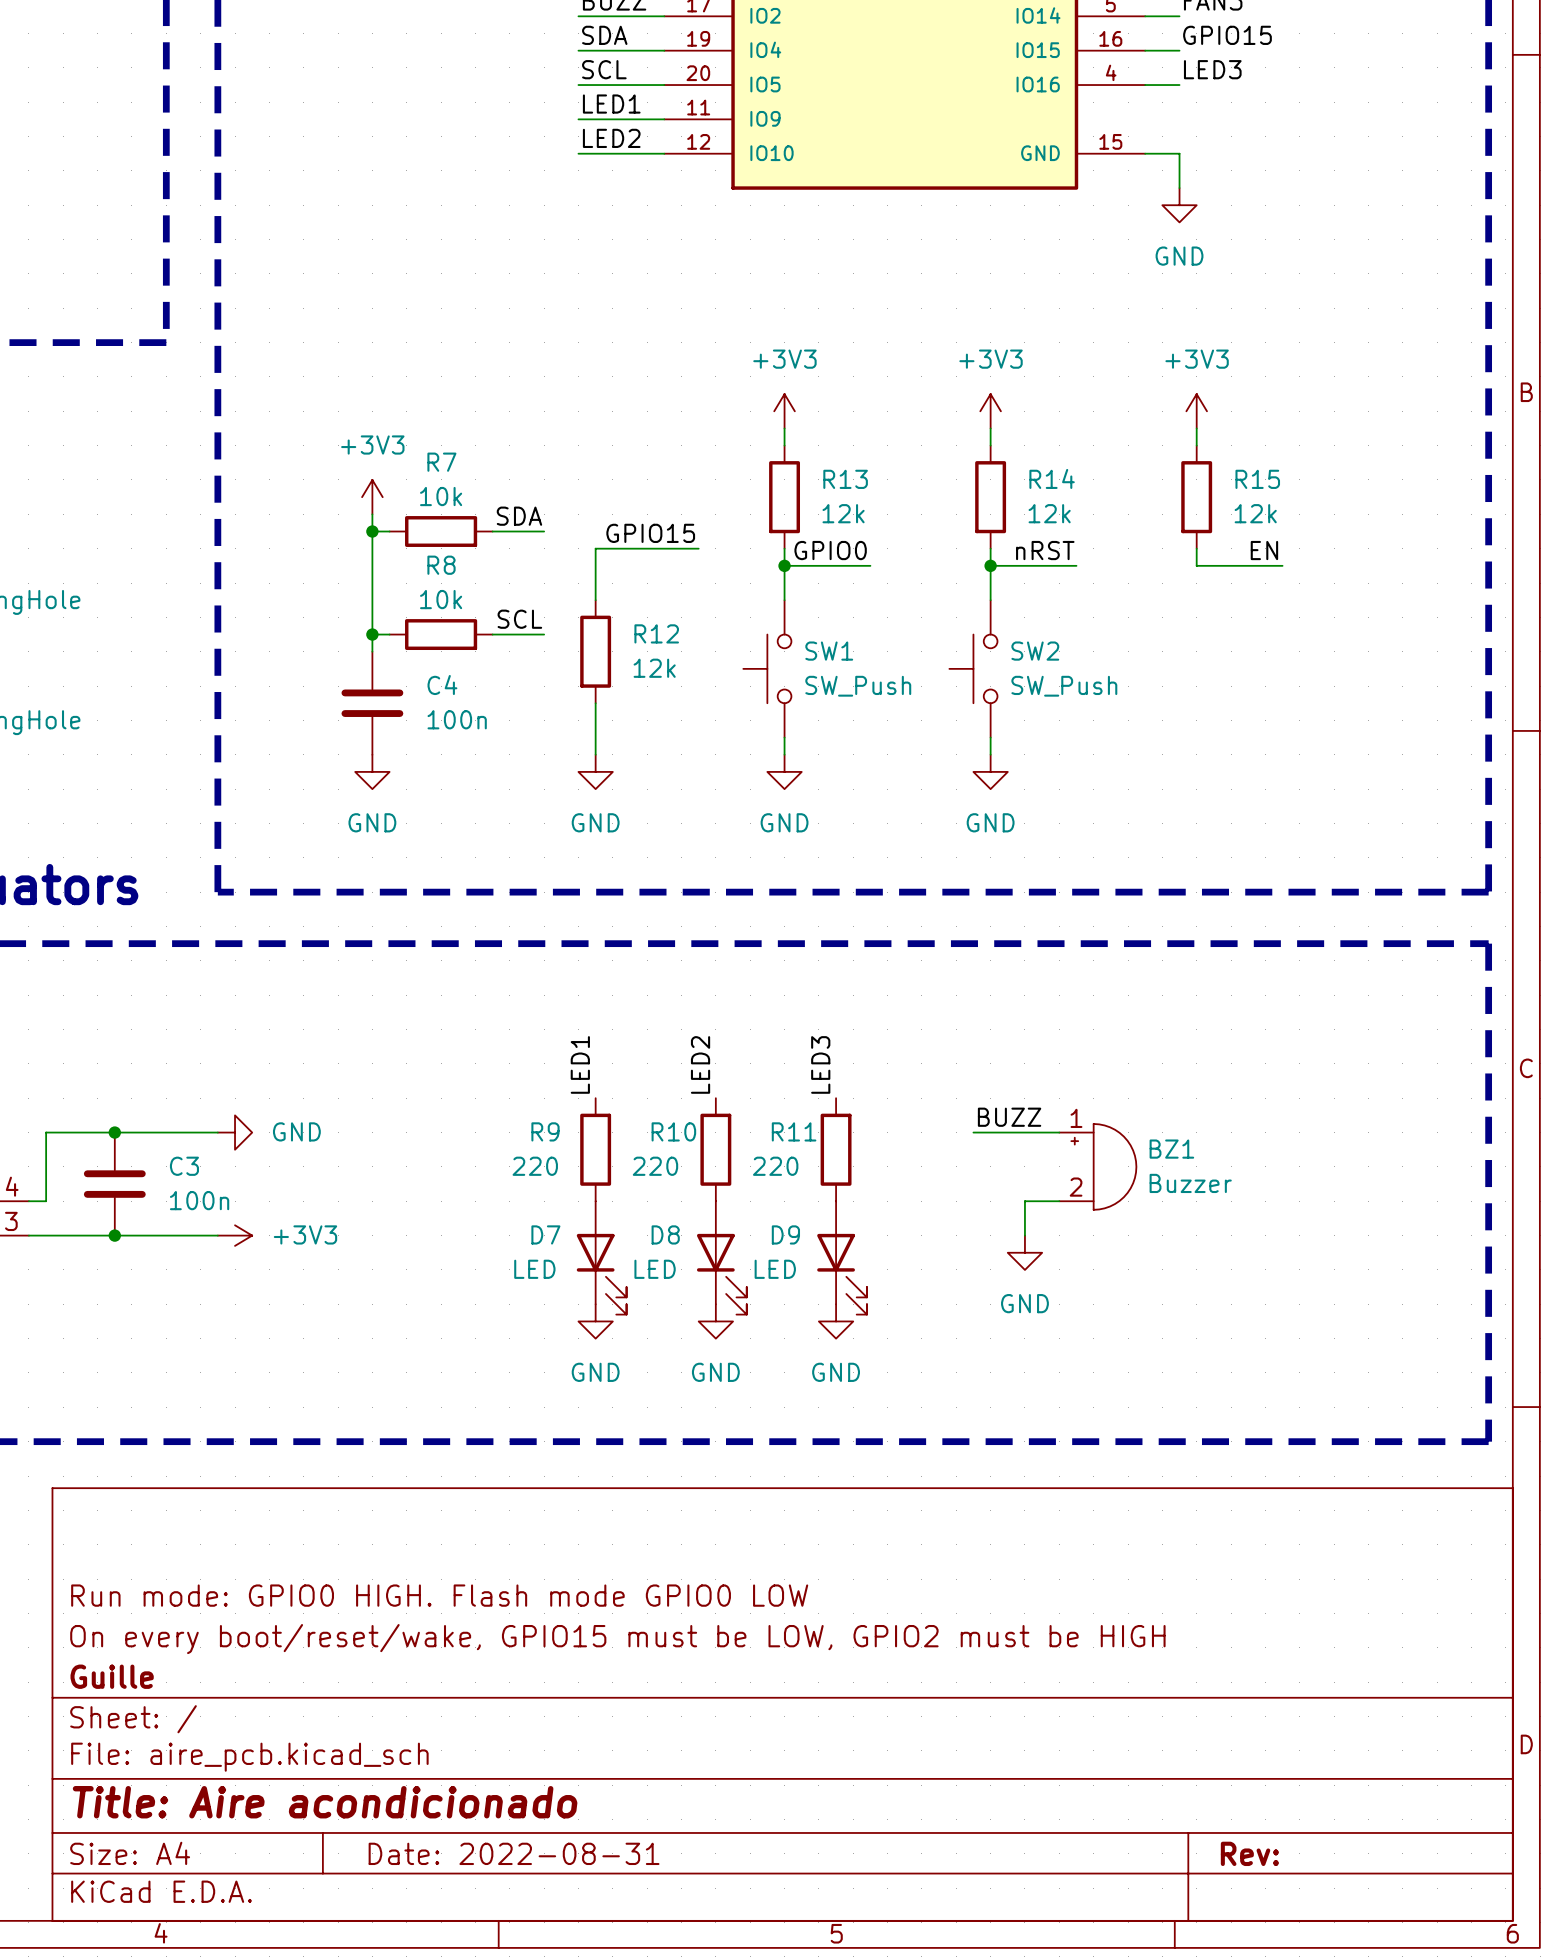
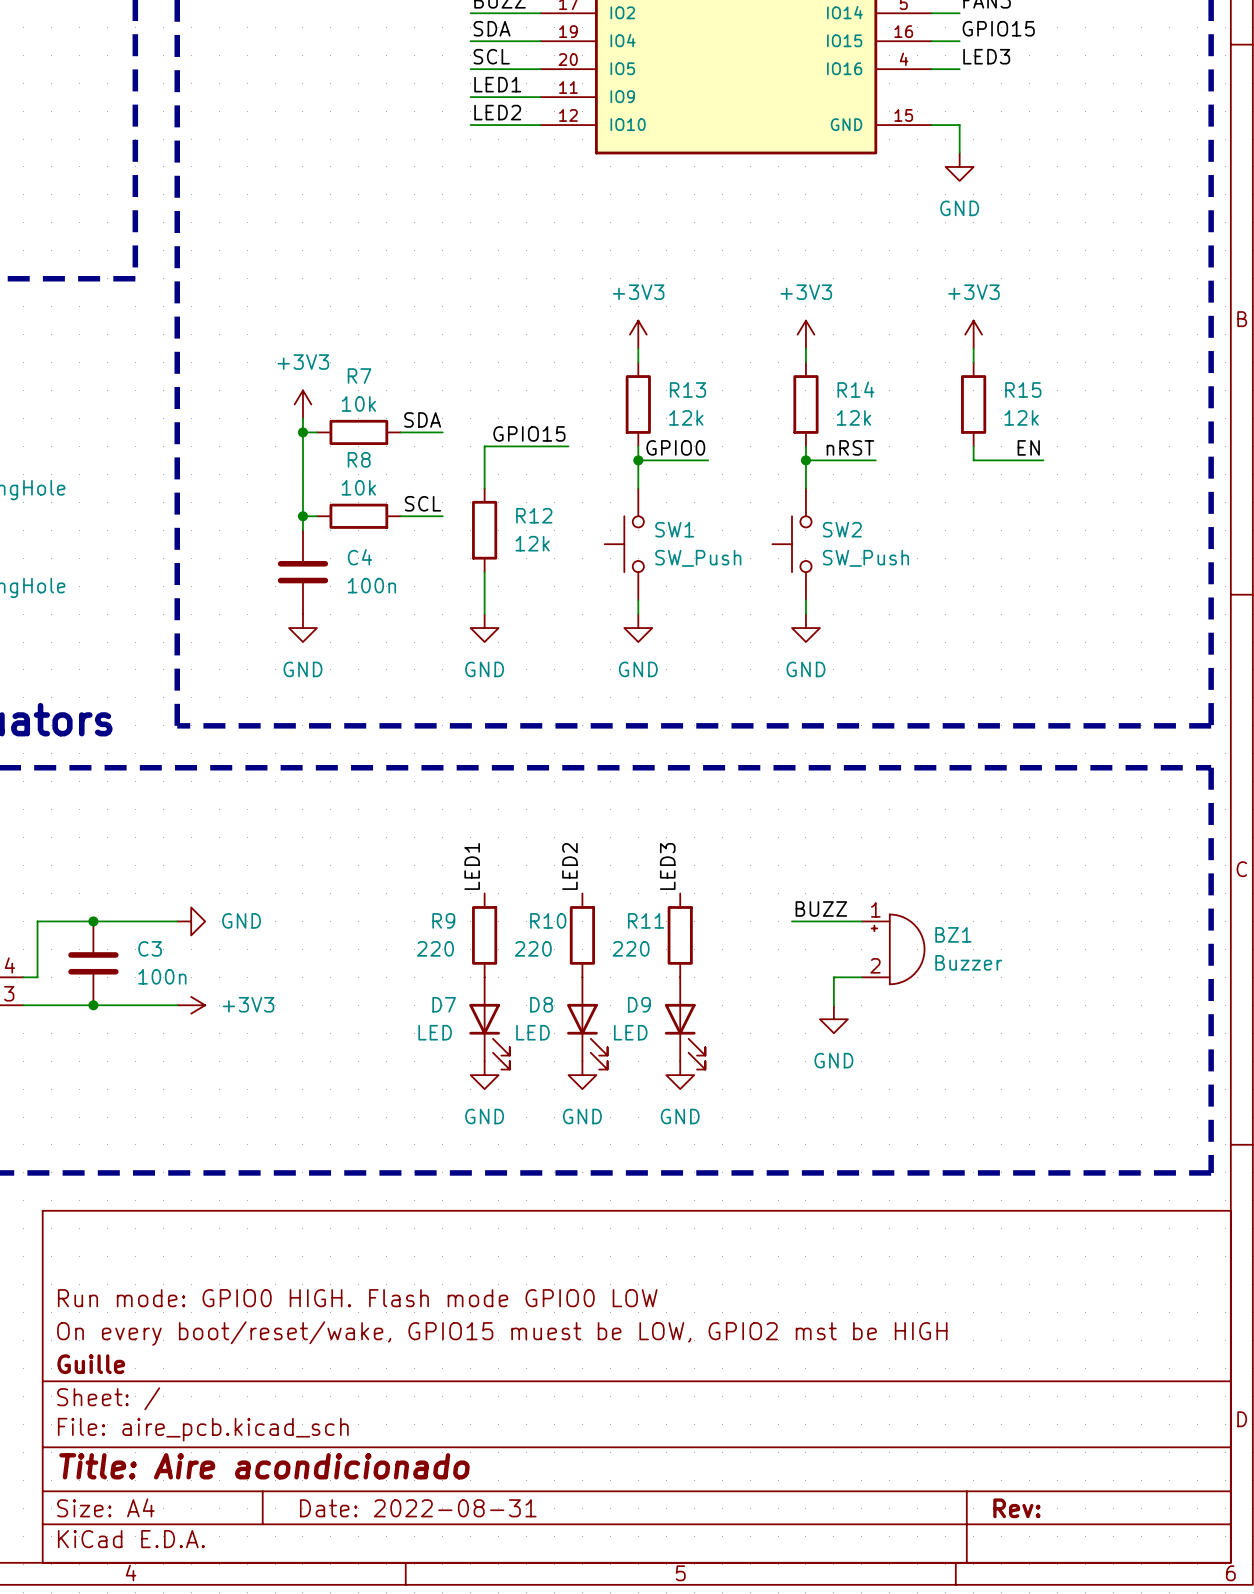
title block: On every boot/reset/wake, GPIO15 must be LOW, GPIO2 must be HIGH (617, 1639) -> On every boot/reset/wake, GPIO15 muest be LOW, GPIO2 mst be HIGH (502, 1333)

